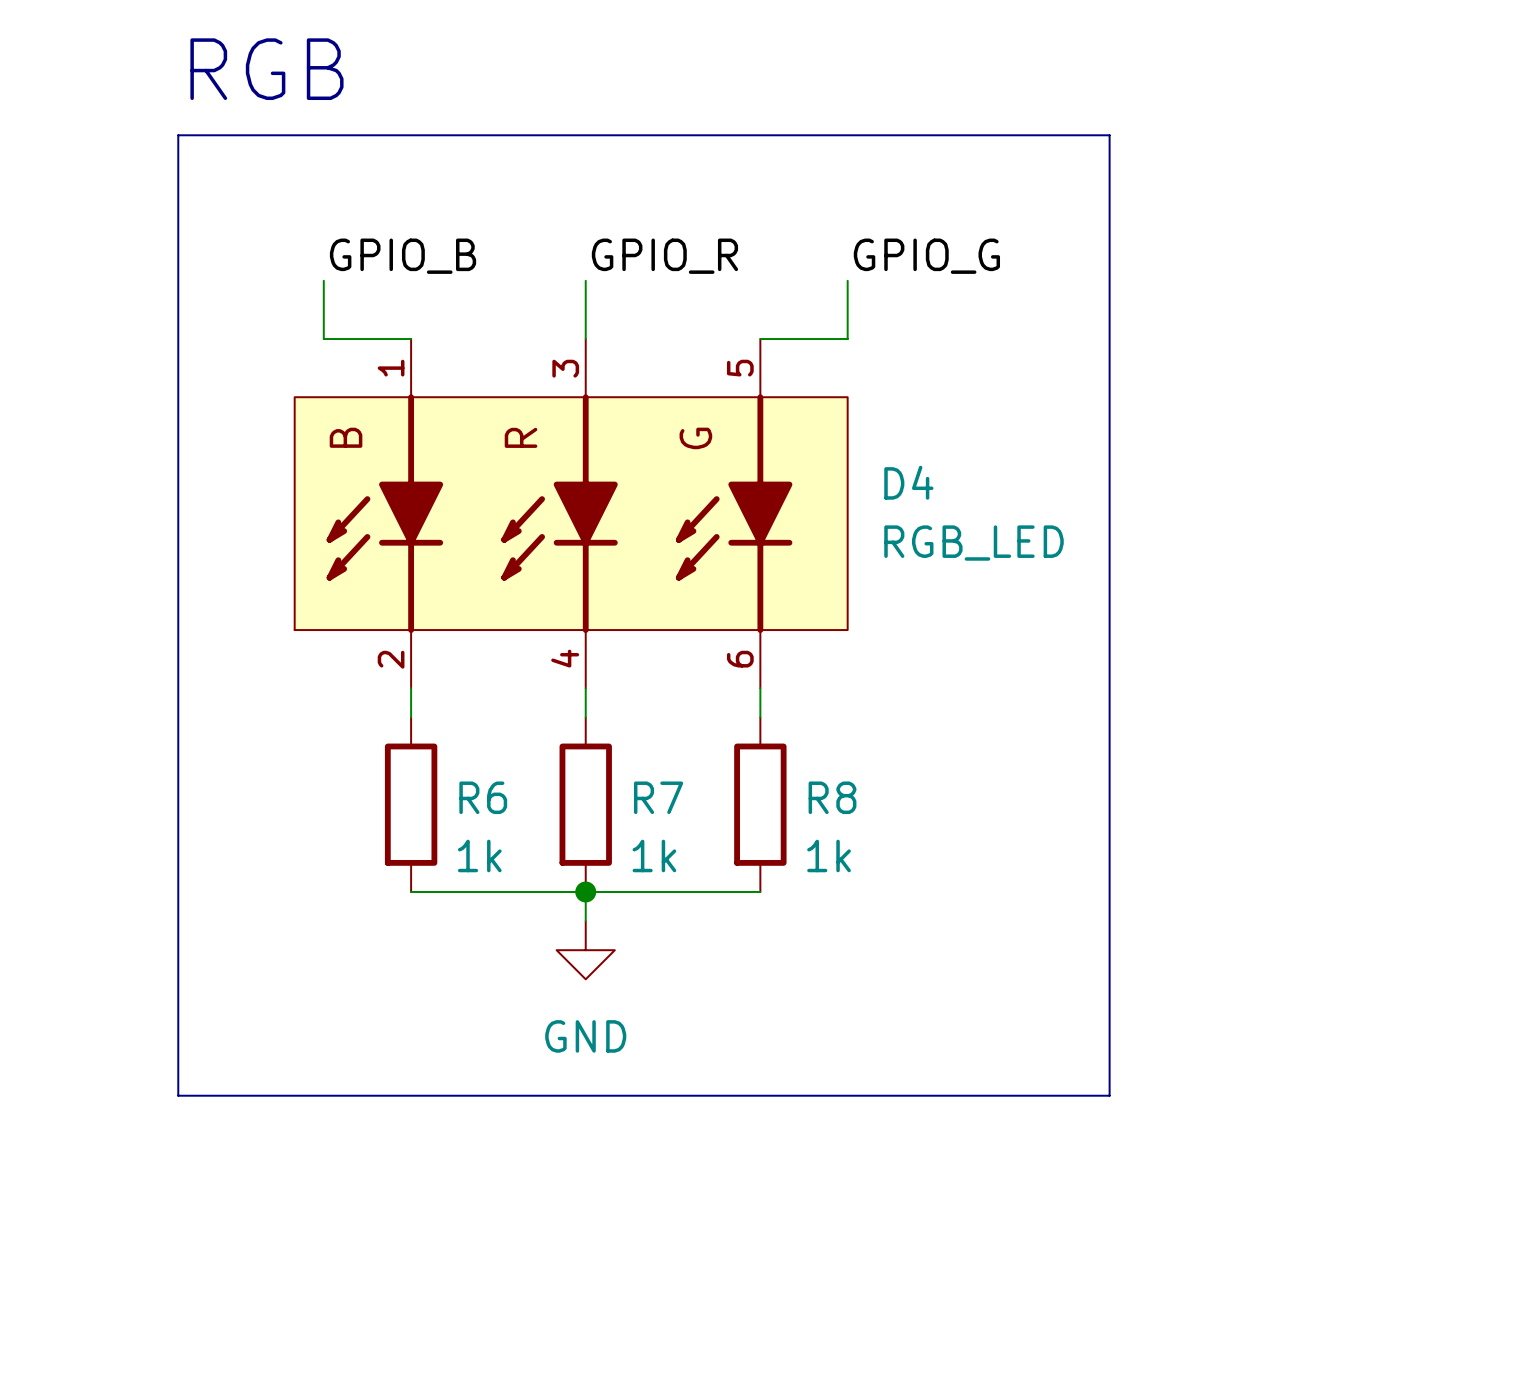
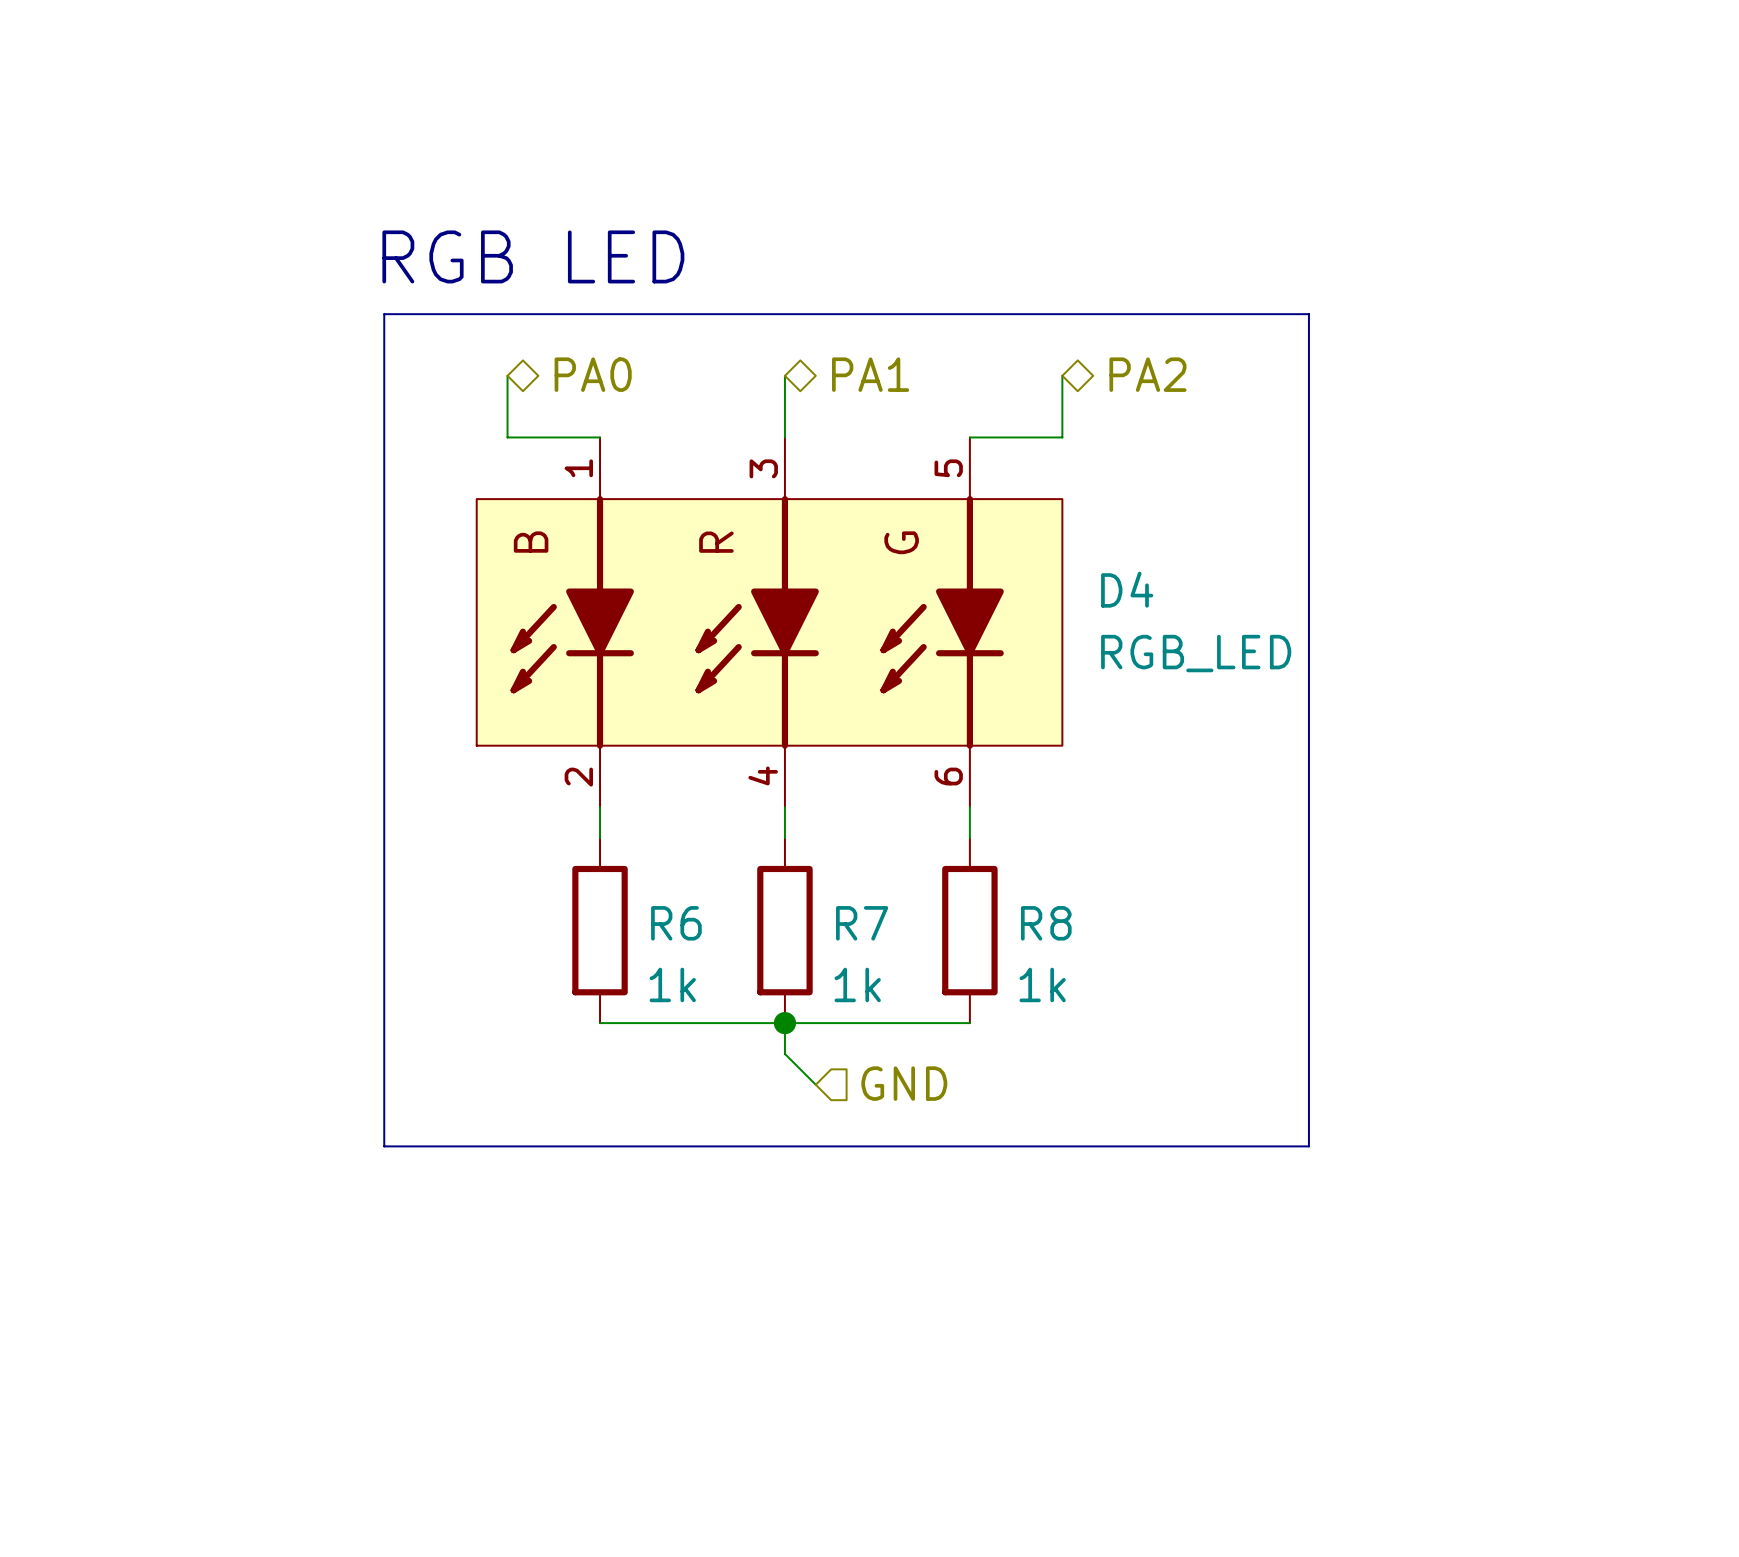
text: RGB (266, 69) -> none
line: (178, 135) (1109, 135) (1109, 1095) (178, 1095) (178, 135) -> (384, 314) (384, 1146) (1308, 1146) (1308, 314) (384, 314)
text: none -> RGB LED (533, 256)
label: GPIO_B (403, 256) -> none
label: GPIO_R (664, 256) -> none
label: GPIO_G (926, 256) -> none
hierarchical label: none -> PA0 (593, 374)
hierarchical label: none -> PA1 (870, 374)
hierarchical label: none -> PA2 (1147, 374)
wire: none -> (784, 1053) (815, 1084)
hierarchical label: none -> GND (904, 1083)
power symbol: GND (585, 950) -> none

